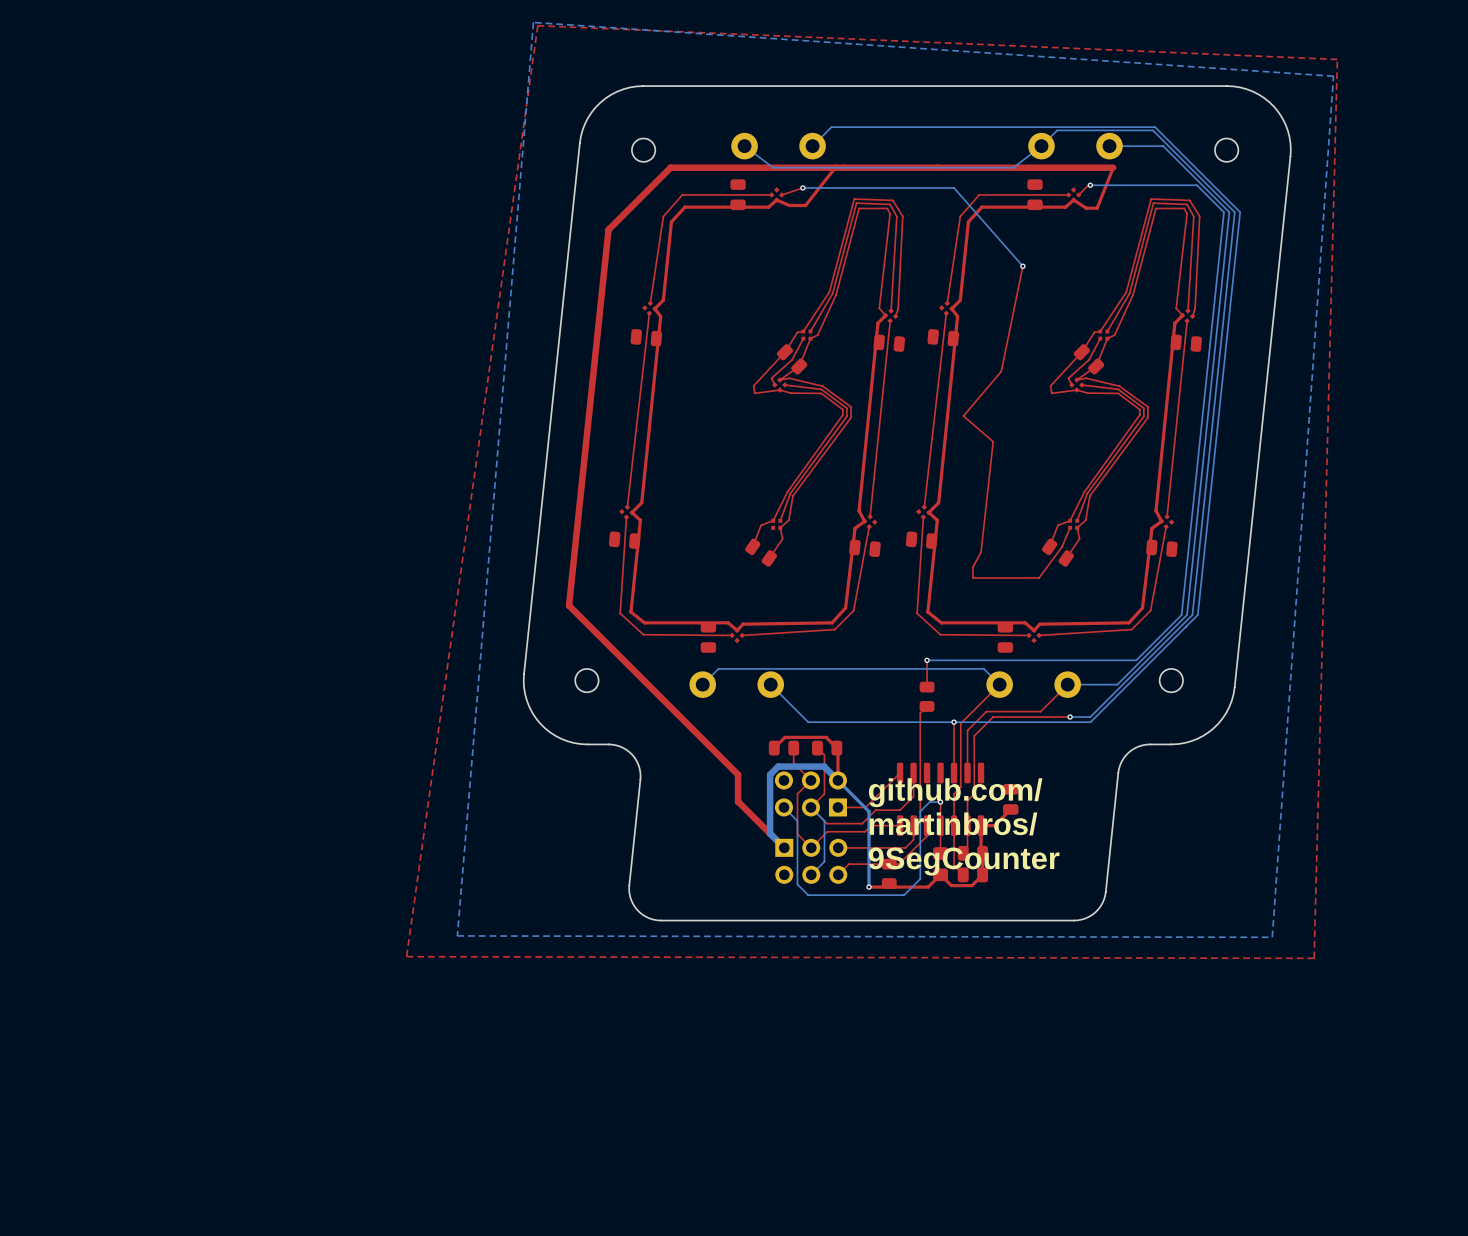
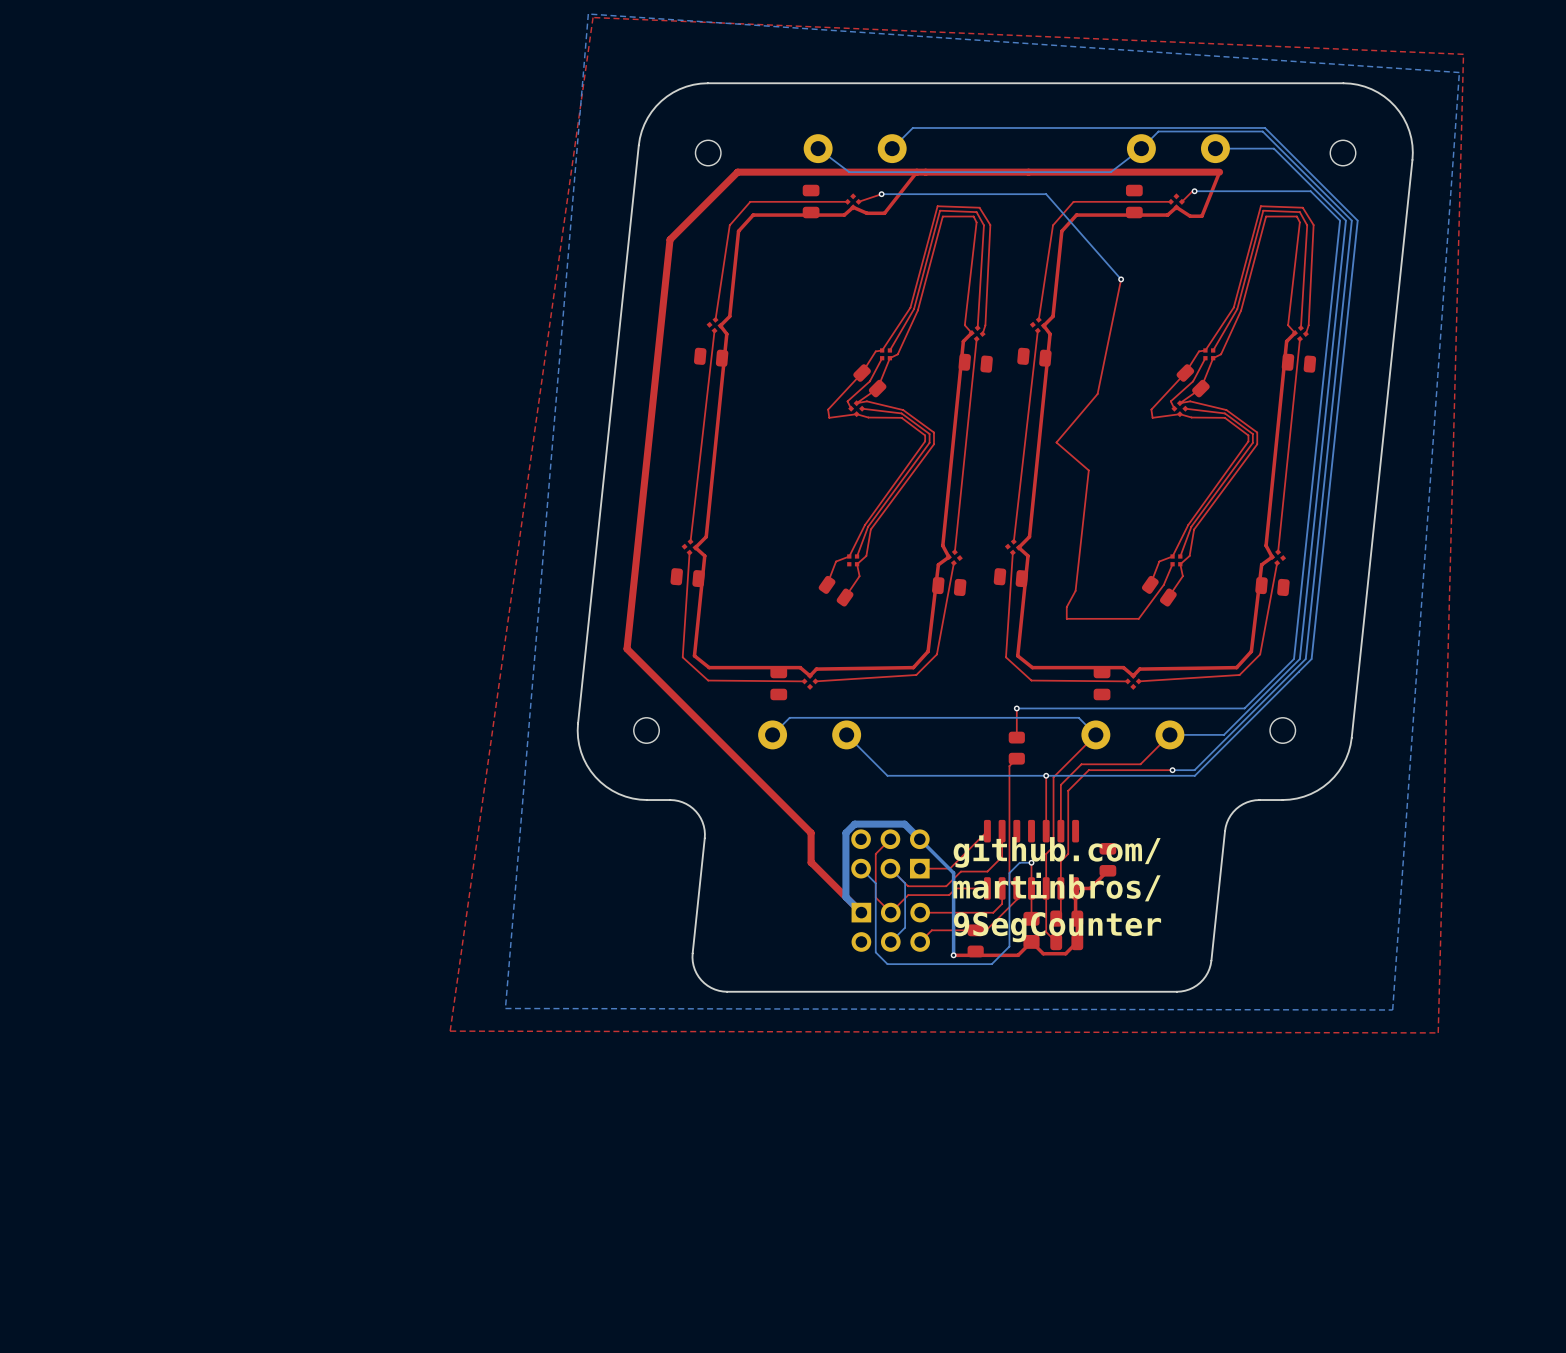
top track: (774, 748) (784, 737) (826, 737) (837, 749) (837, 780) -> none
part: (783, 748) -> none
top track: (793, 748) (793, 763) (810, 780) -> none
top track: (817, 748) (824, 755) (824, 793) (810, 807) -> none
part: (827, 748) -> none

